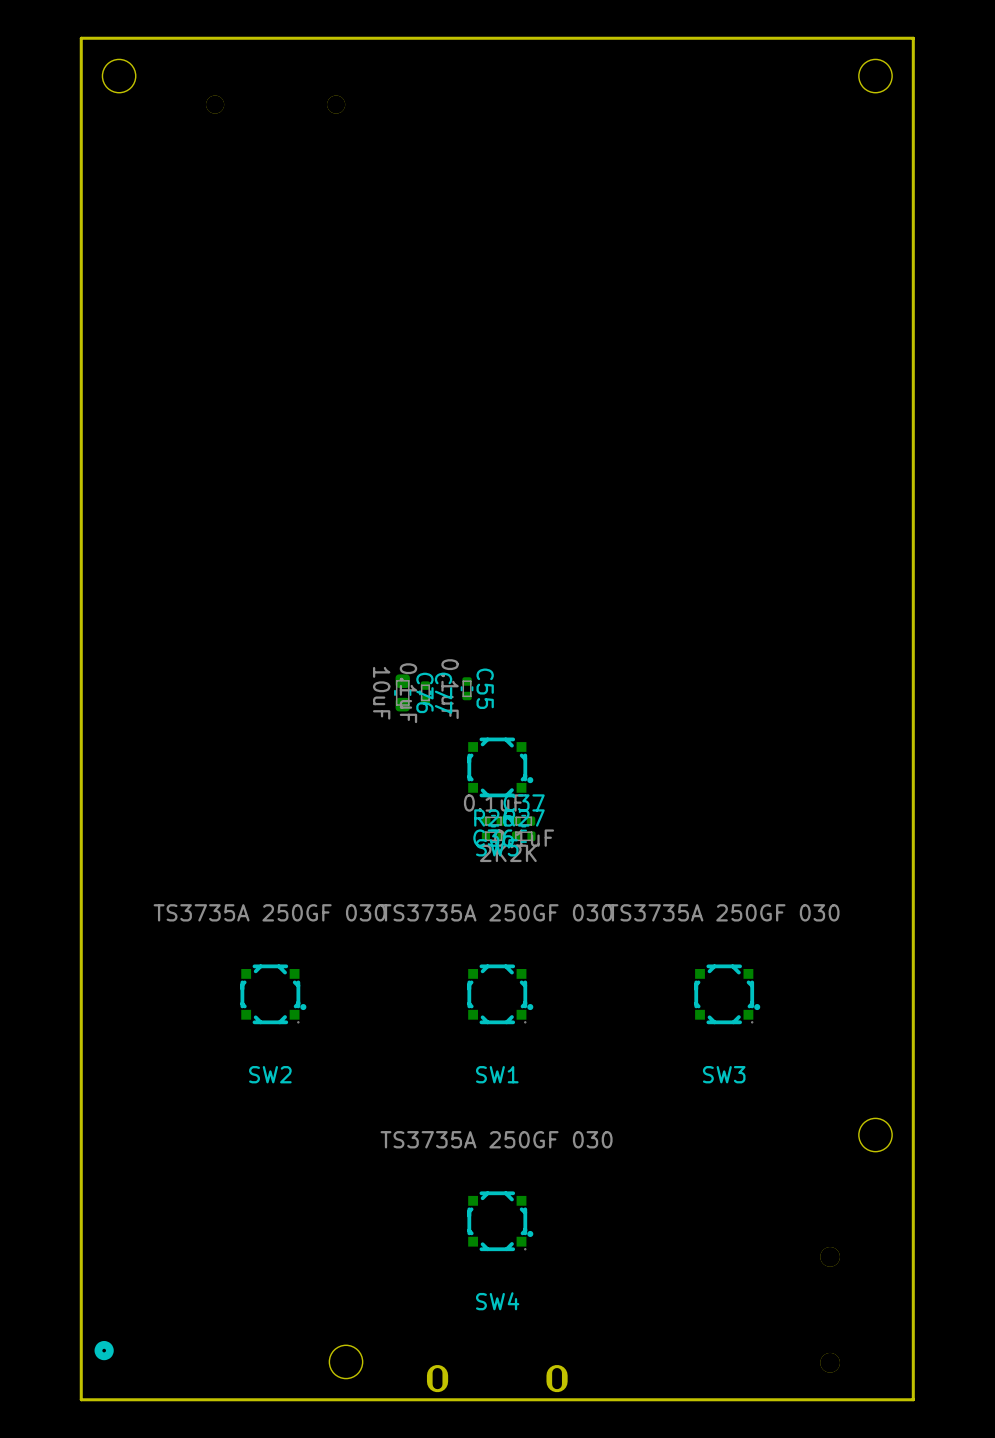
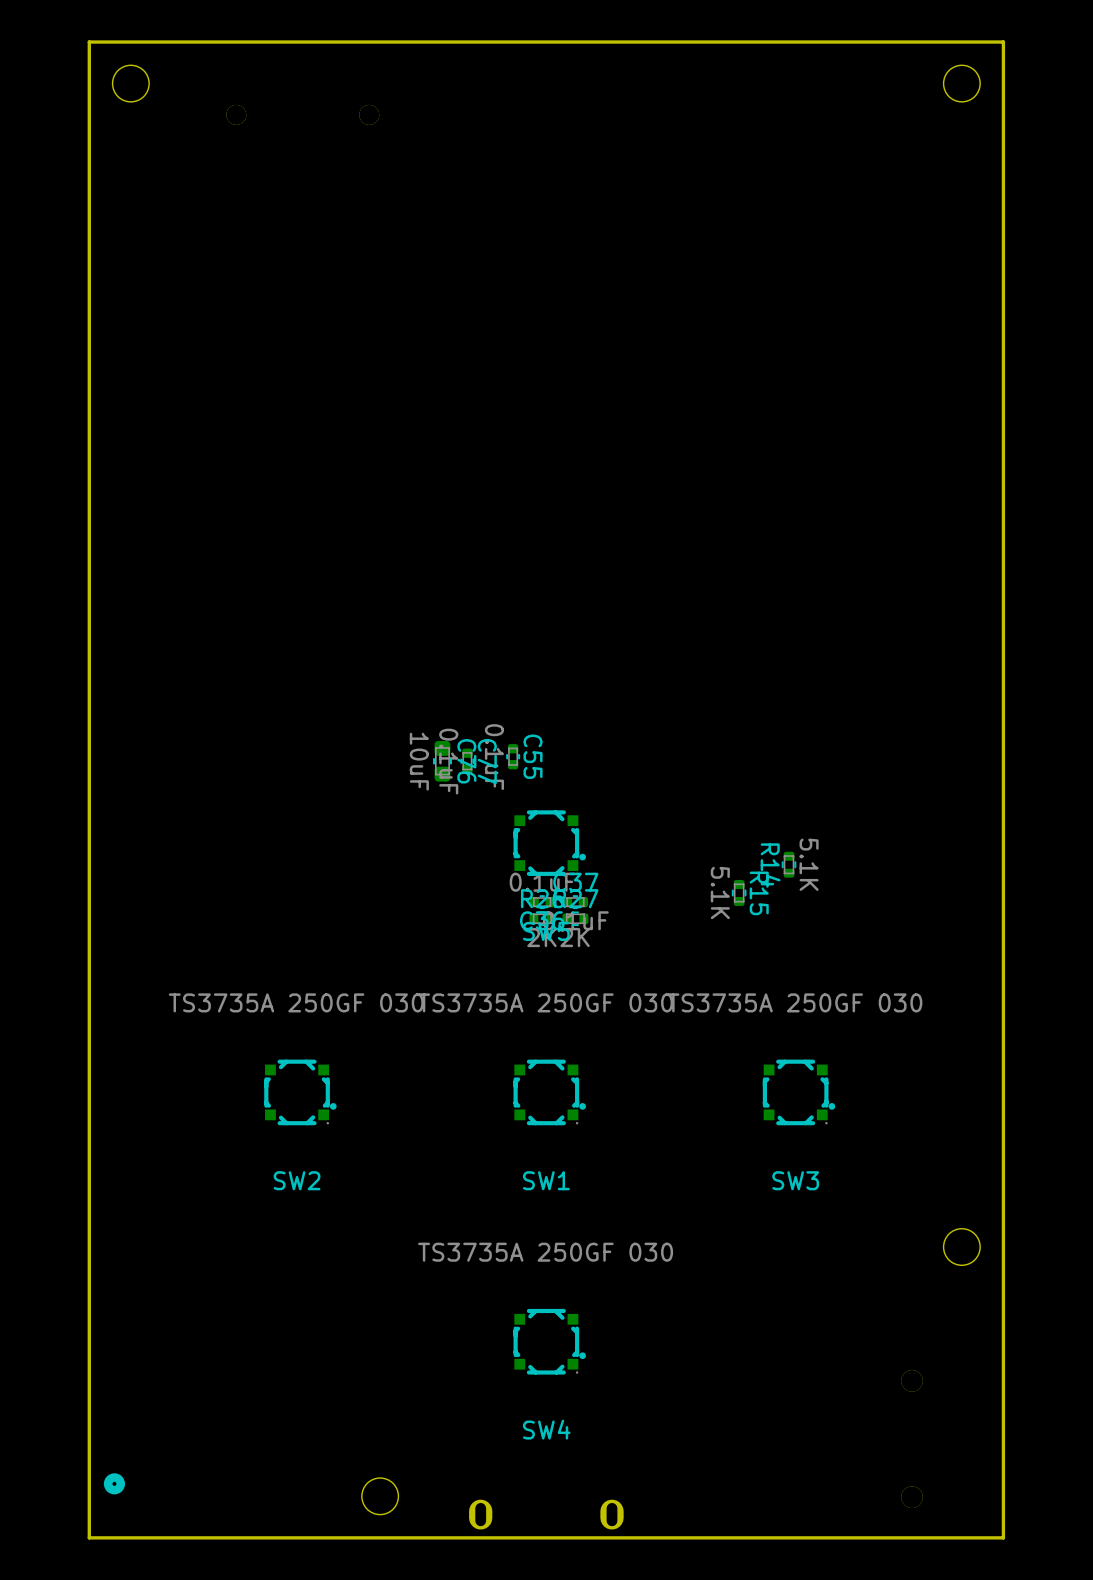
R14: none -> 5.1K (789, 864)
R15: none -> 5.1K (739, 892)

